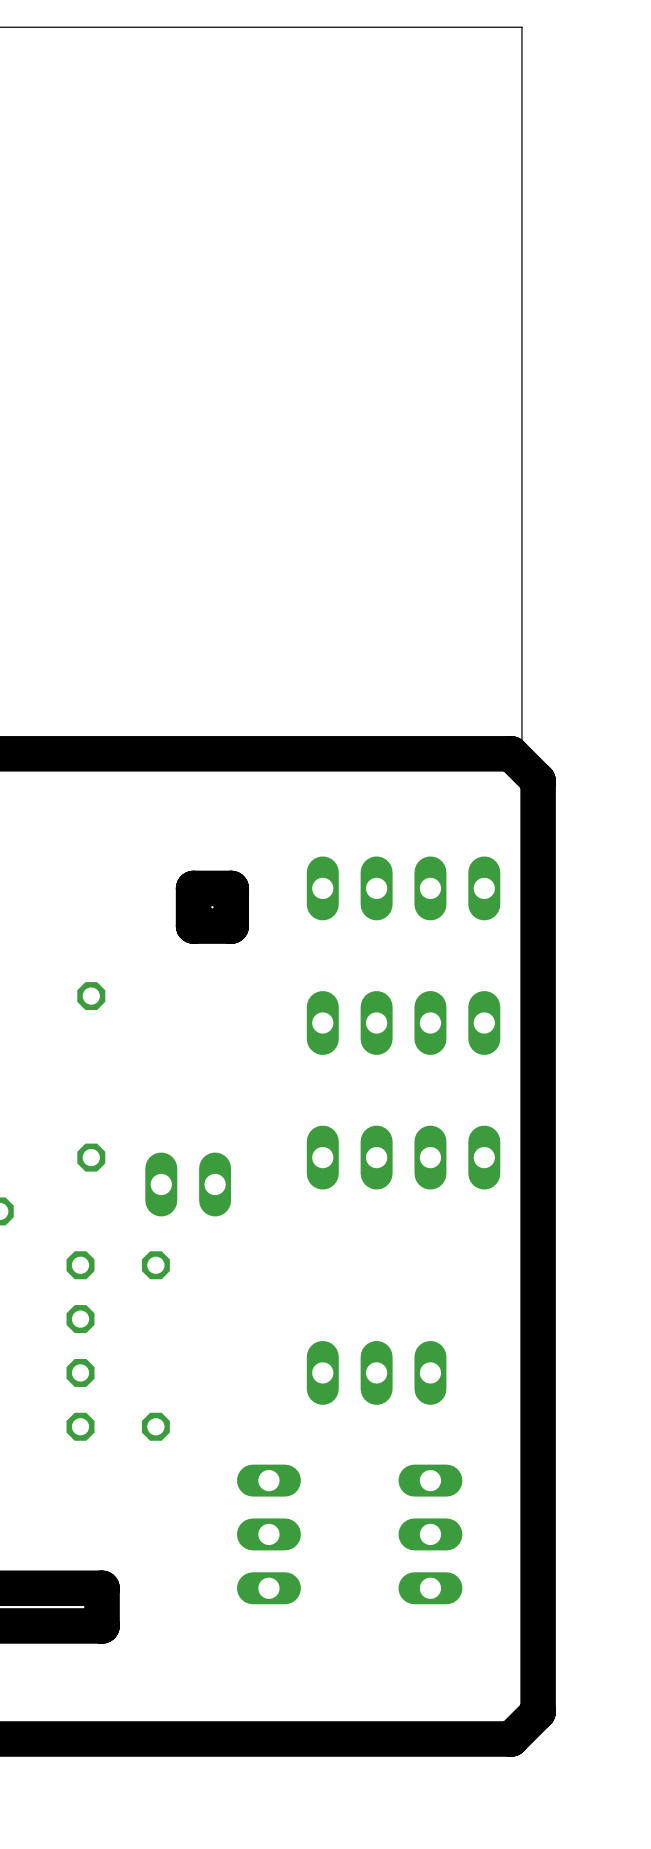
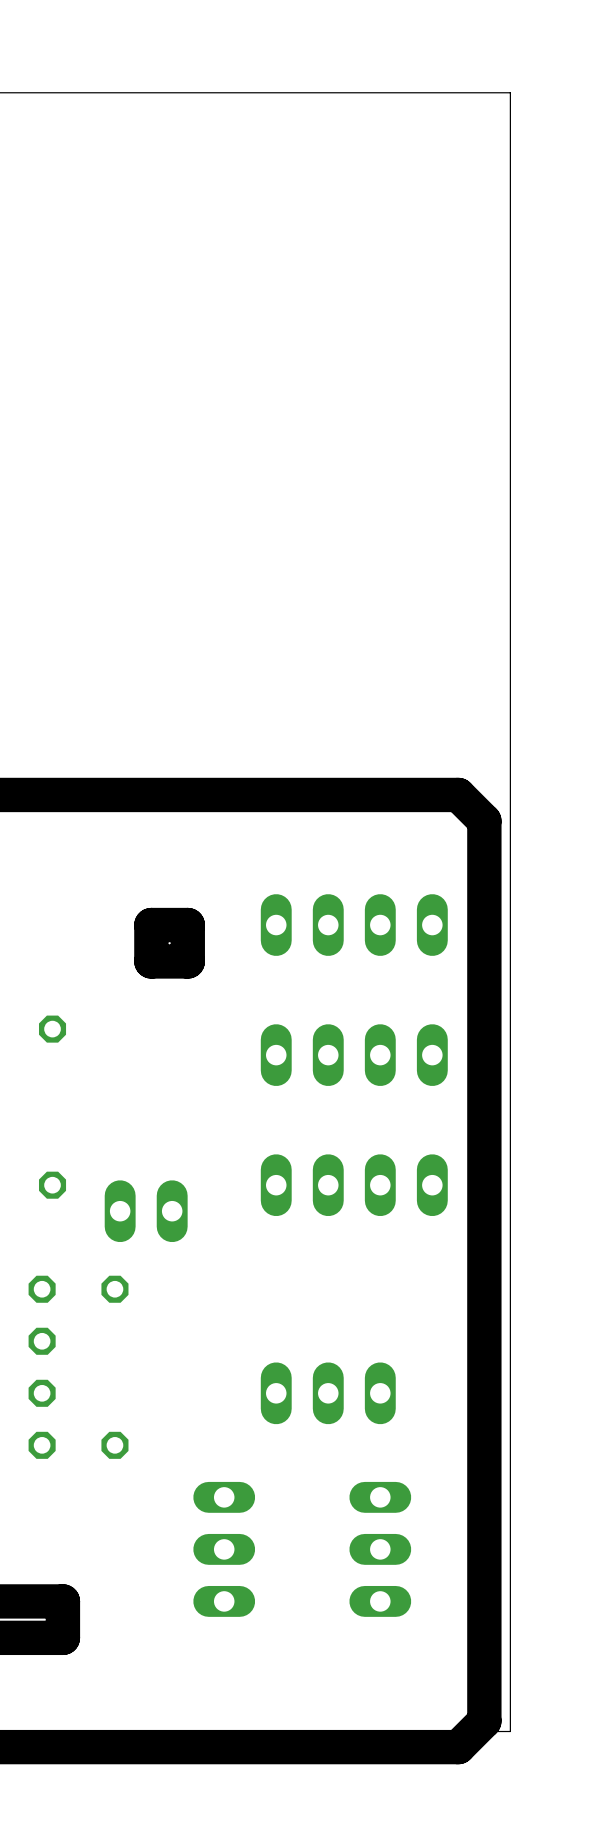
board edge: (521, 27) (521, 1722) -> (468, 92) (510, 92) (510, 1731) (468, 1731)

